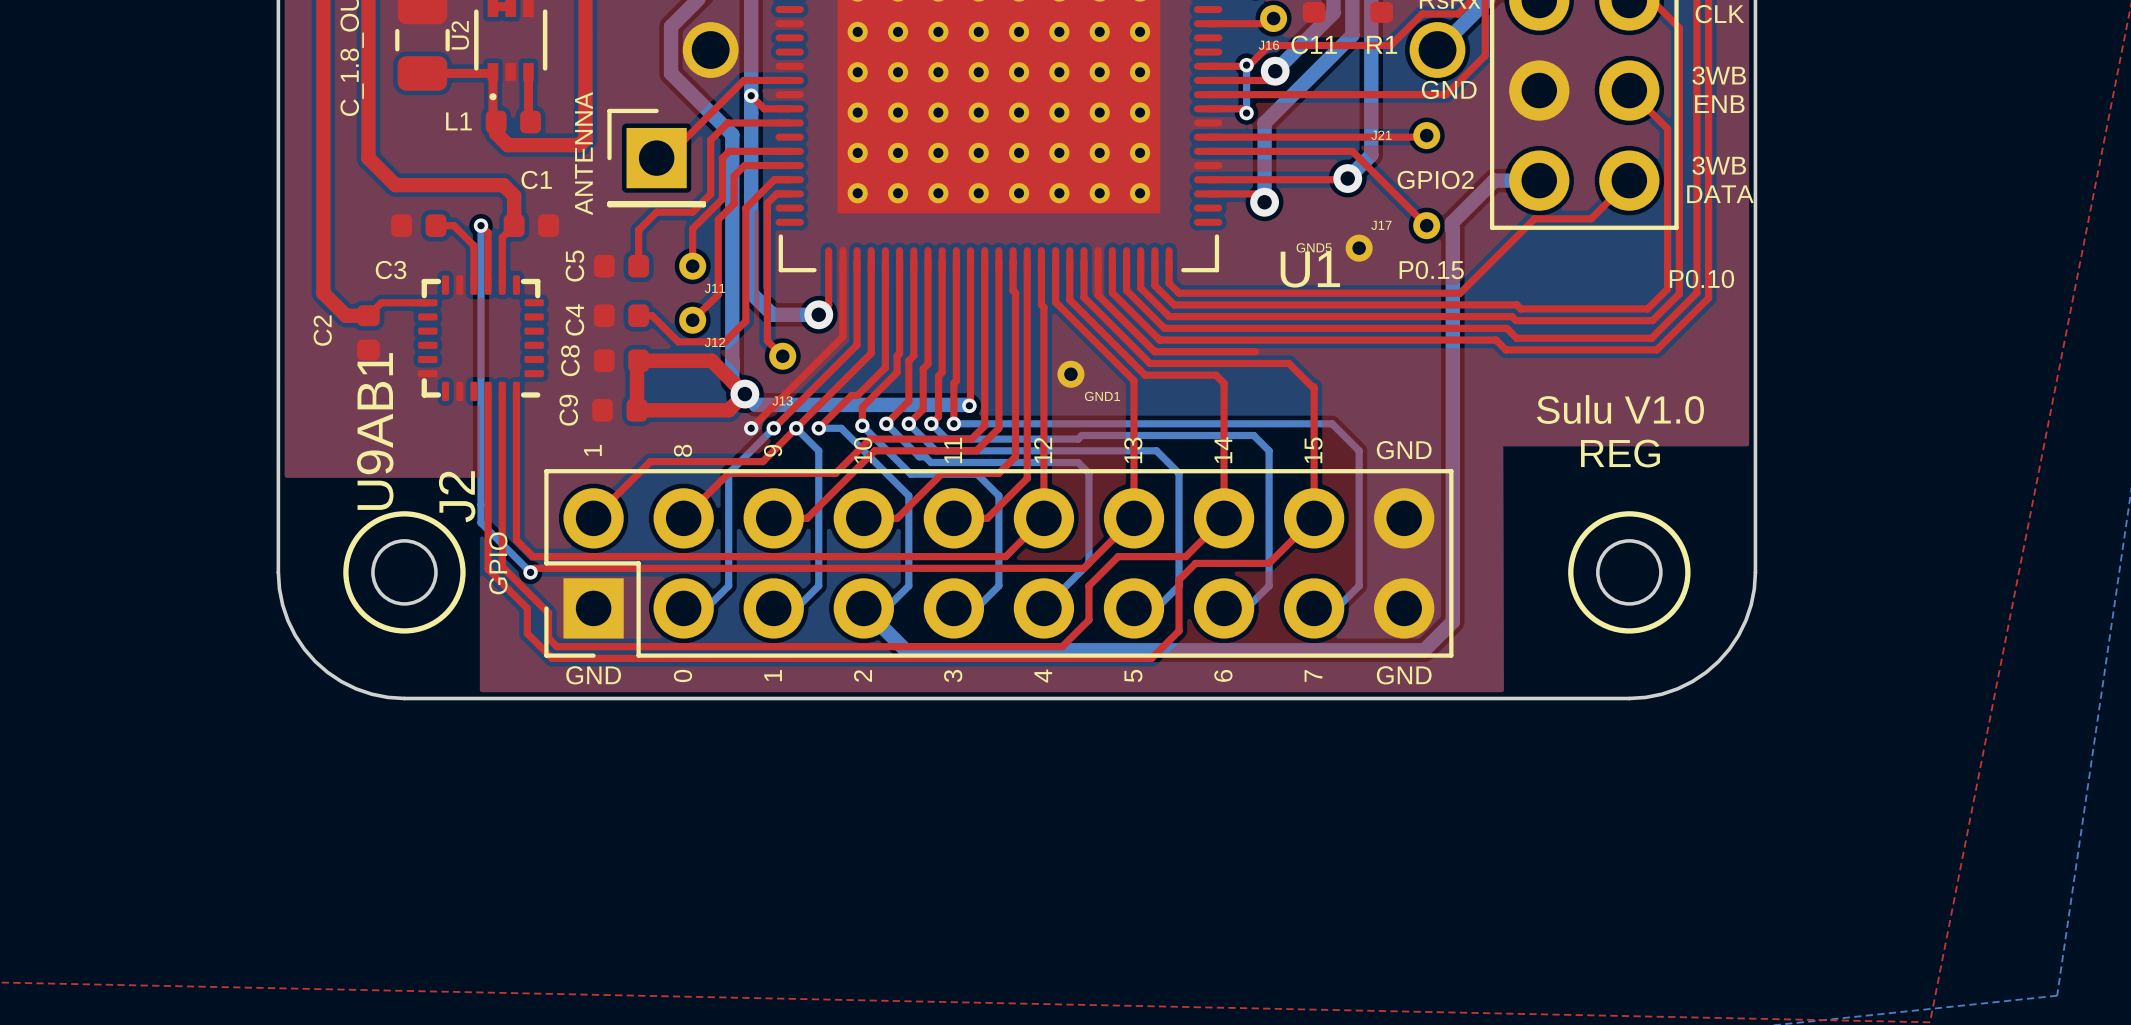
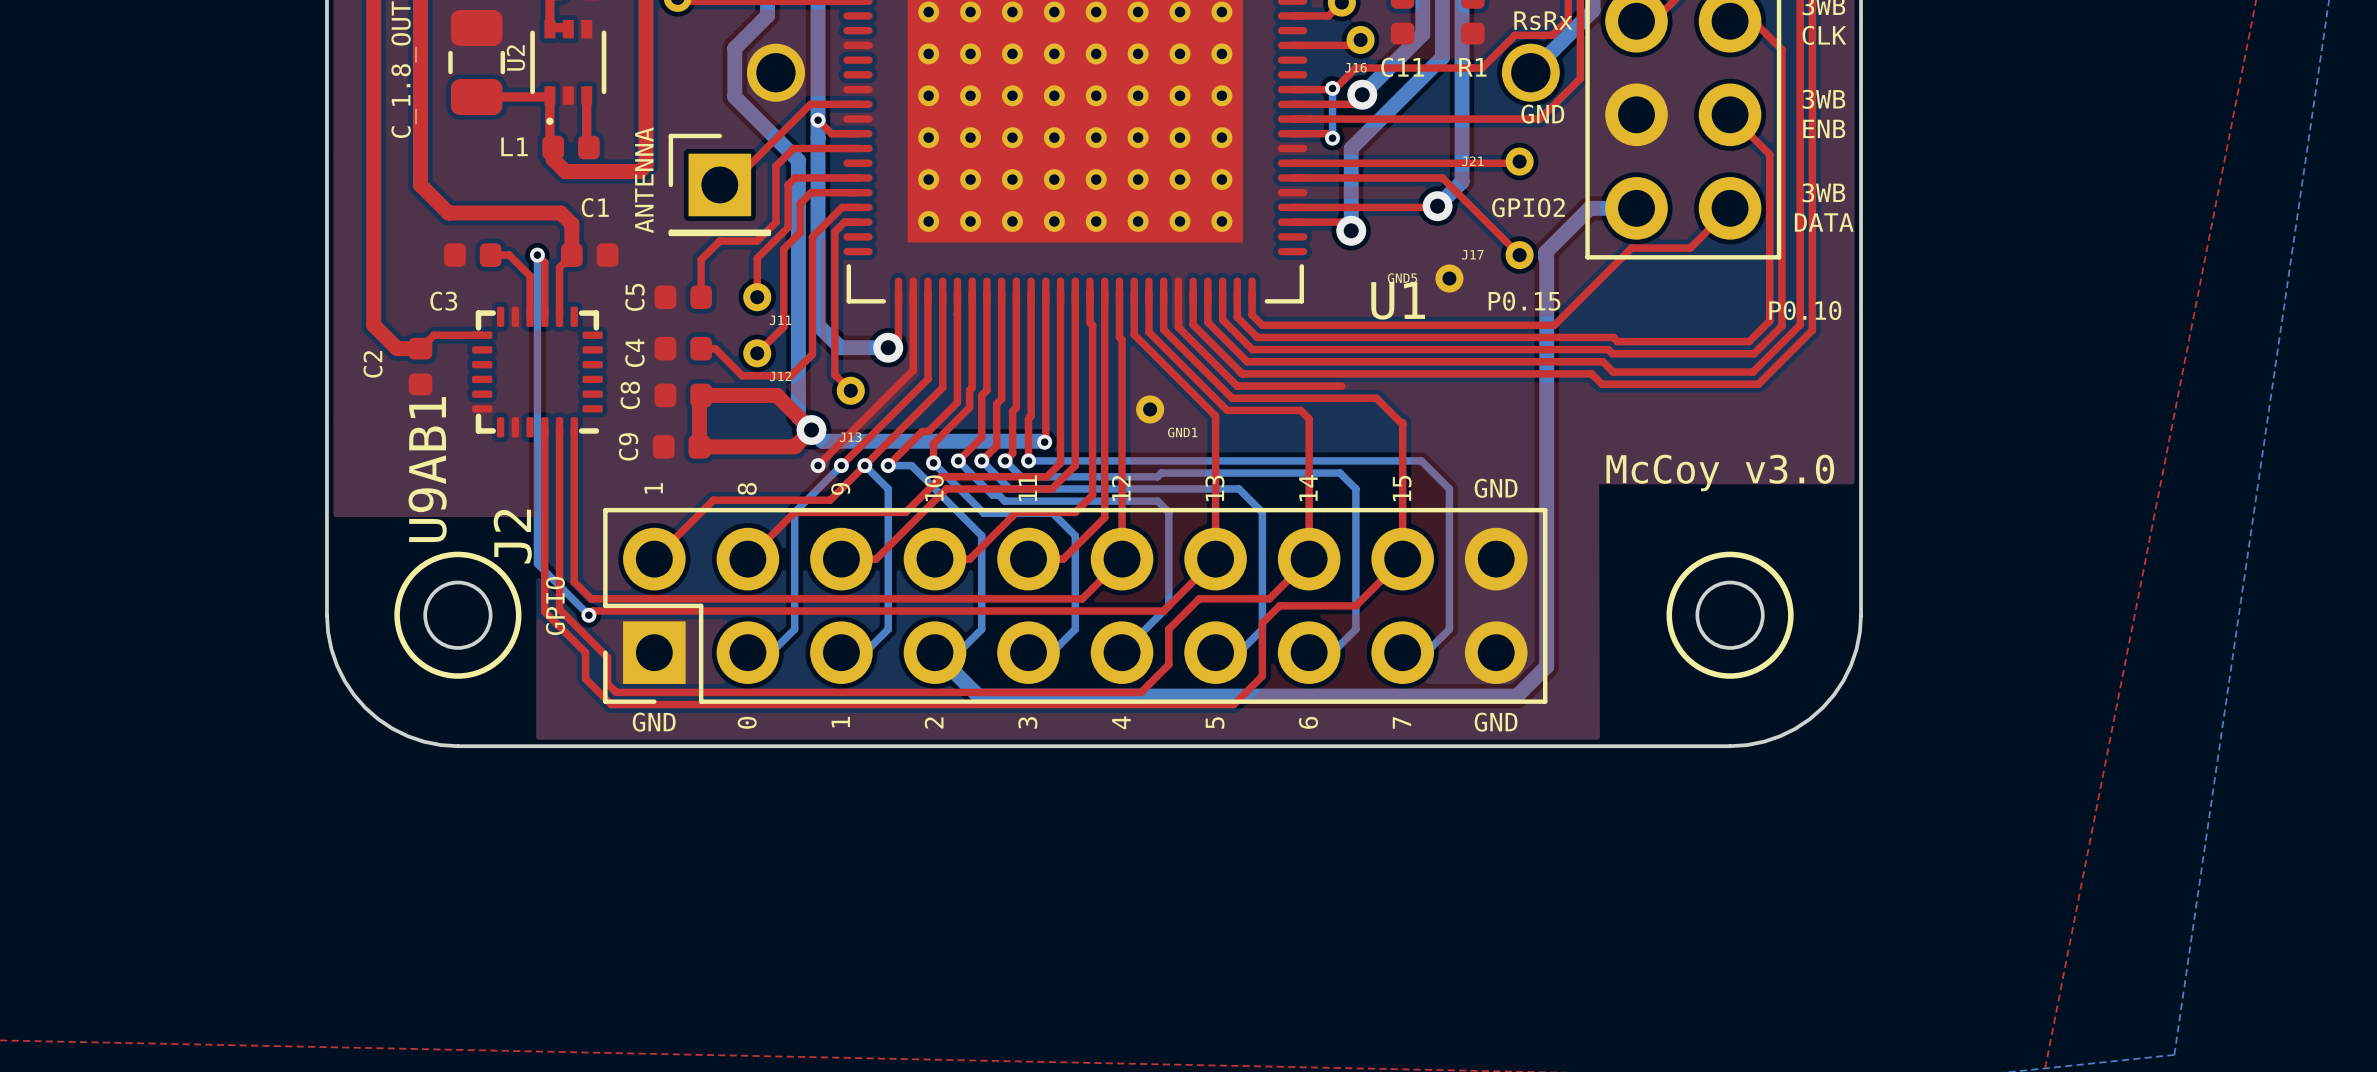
text: Sulu V1.0 (1620, 409) -> none
text: none -> McCoy v3.0 (1720, 472)
text: REG (1620, 453) -> none

